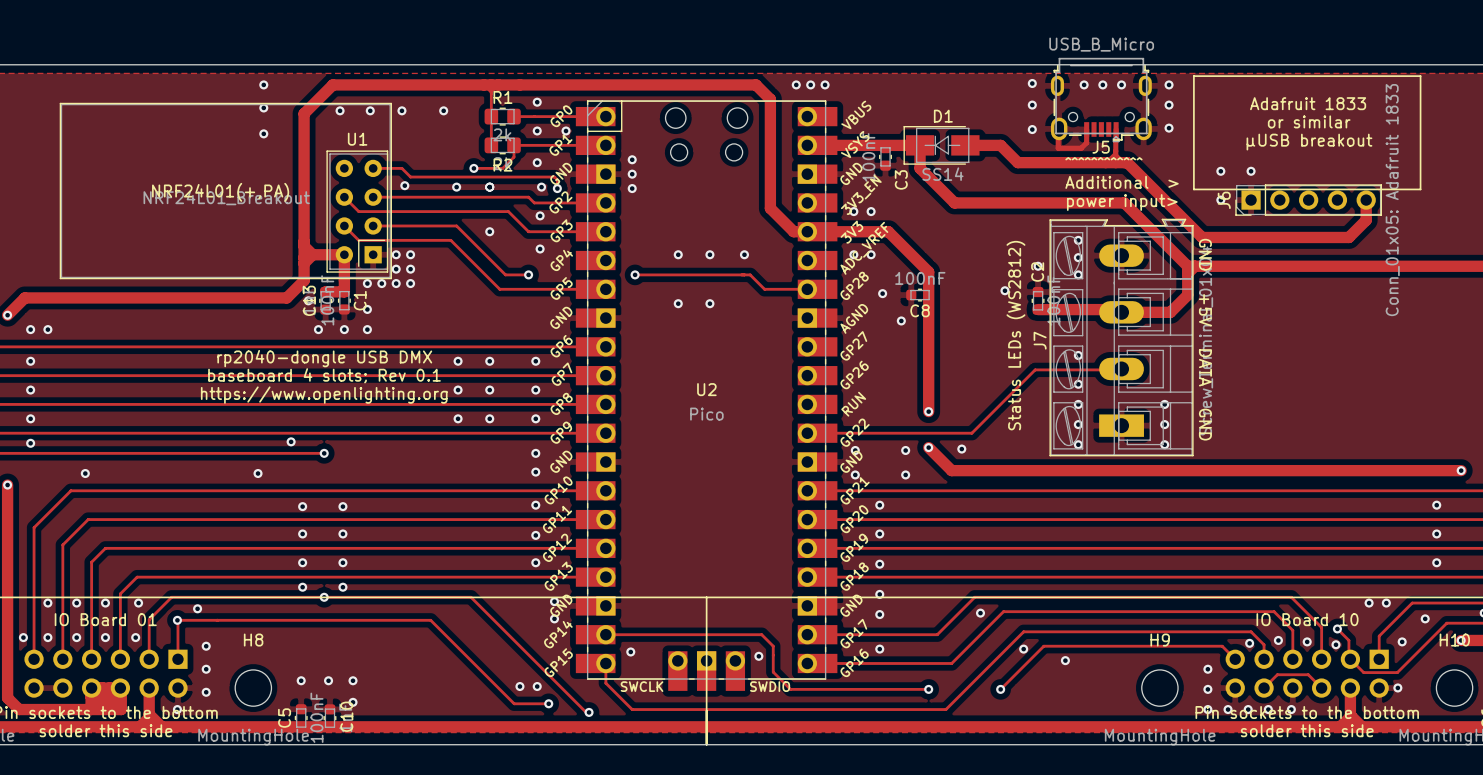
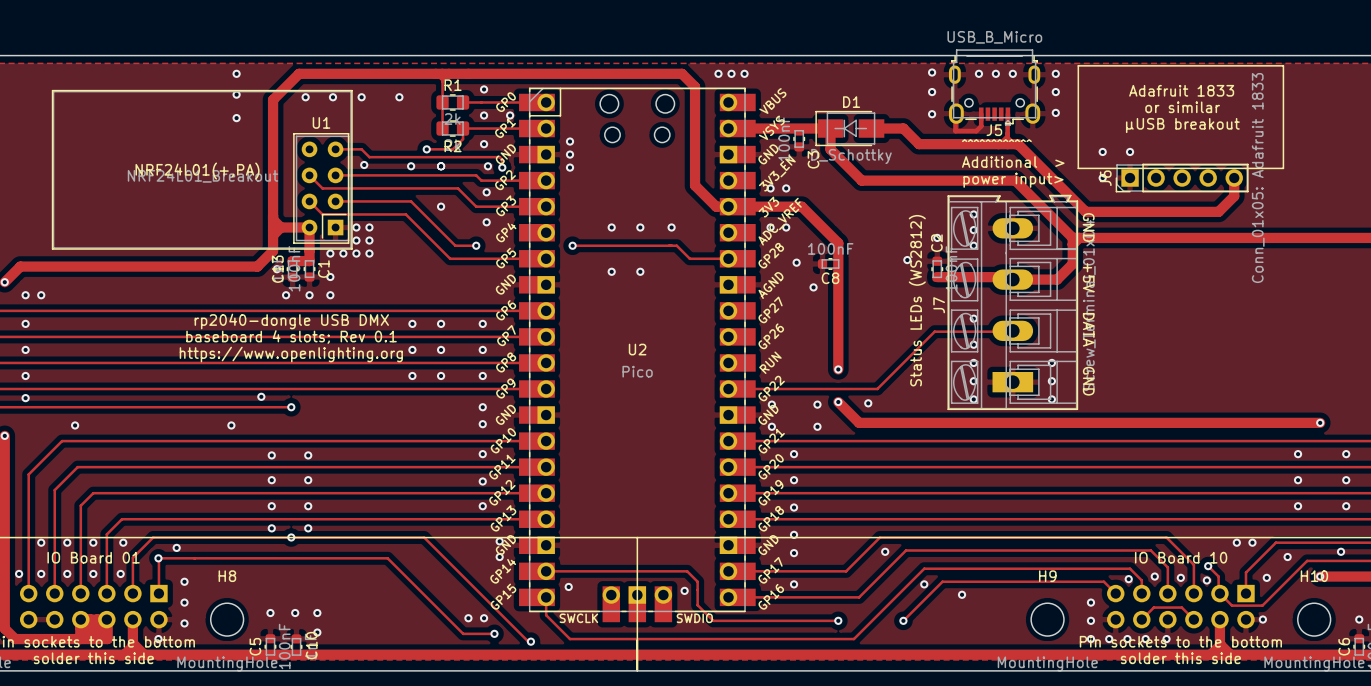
D1 value: SS14 (942, 174) -> D_Schottky (851, 156)

